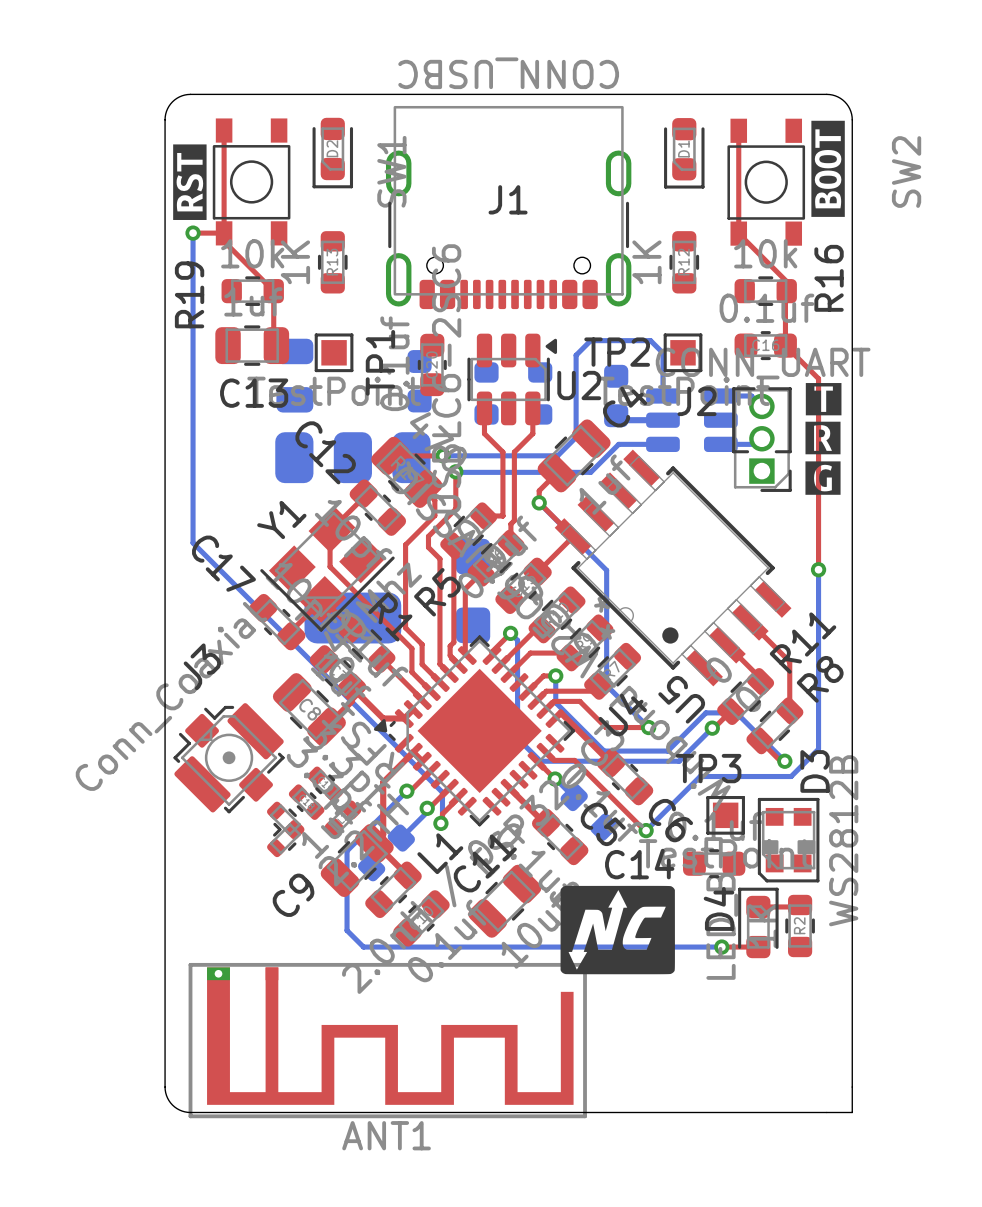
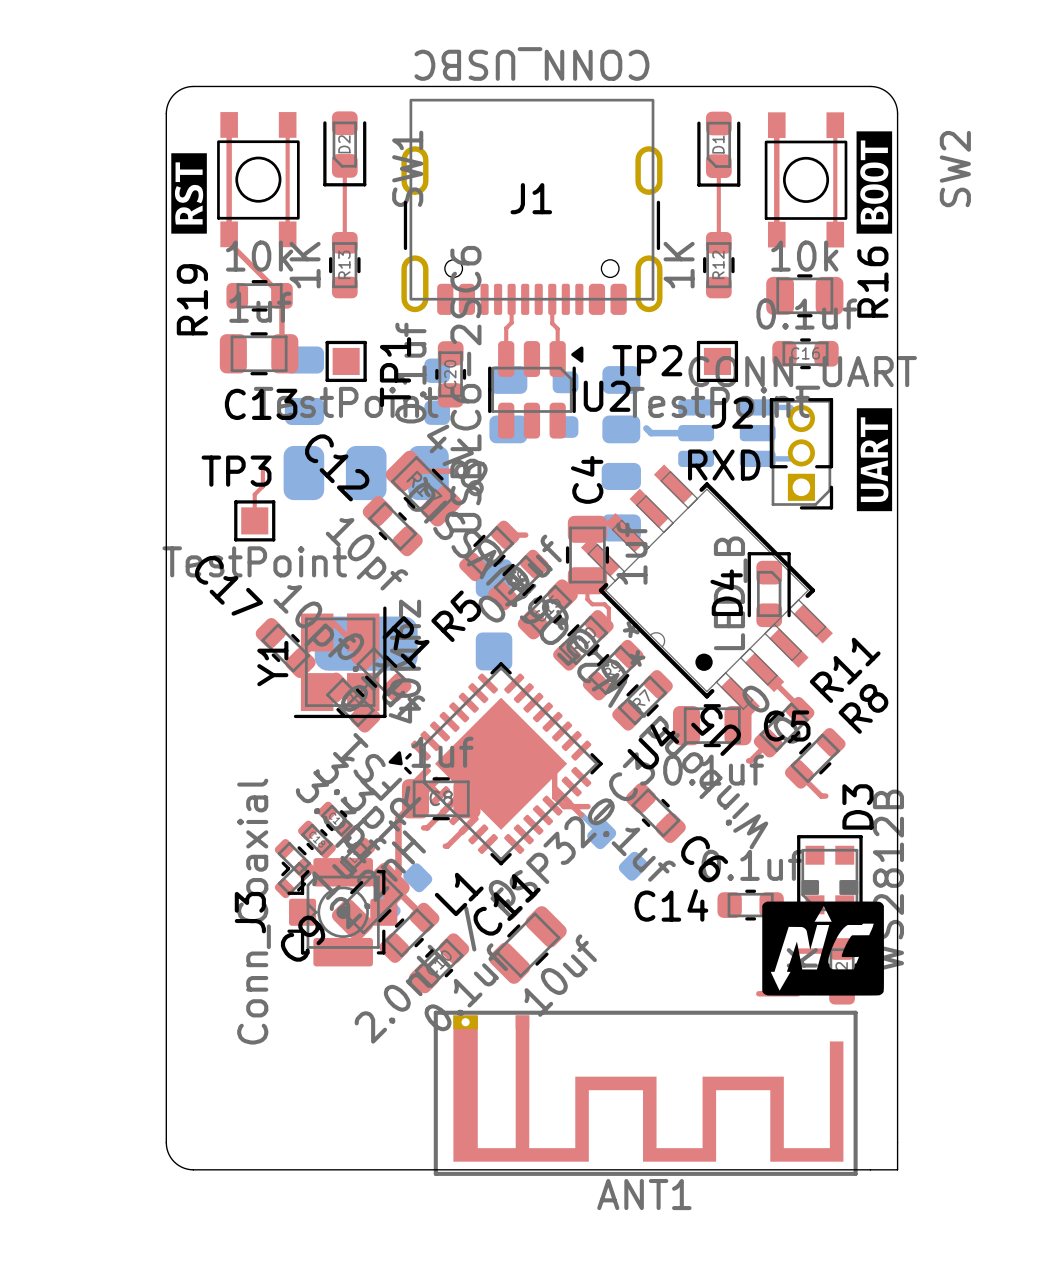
top track: none -> (287, 124) (287, 234)
top track: none -> (835, 125) (835, 234)
drawing position: (828, 168) -> (874, 182)
top track: none -> (344, 165) (344, 240)
top track: none -> (718, 166) (718, 240)
drawing position: (189, 182) -> (189, 193)
top track: (193, 233) (223, 233) -> none
bottom track: (193, 233) (193, 542) (442, 792) (440, 823) -> none
via: (193, 233) -> none
top track: (738, 233) (786, 281) (785, 345) (818, 378) (818, 569) -> none
R16 footprint: [734, 276, 797, 306] -> [766, 274, 844, 318]
top track: none -> (511, 299) (511, 322) (506, 328) (506, 359)
top track: none -> (552, 299) (552, 323) (557, 328) (557, 359)
part footprint: [474, 362, 499, 425] -> [489, 366, 528, 444]
part footprint: [604, 364, 629, 428] -> [602, 366, 641, 444]
drawing: [805, 383, 842, 416] -> none
bottom track: (662, 396) (662, 353) (650, 340) (590, 340) (576, 355) (576, 437) (557, 455) (443, 455) -> none
top track: (484, 408) (484, 433) (502, 452) (502, 515) -> none
top track: (532, 408) (532, 433) (514, 452) (514, 520) (510, 524) (510, 543) -> none
drawing shape: [805, 421, 841, 455] -> [856, 408, 893, 512]
bottom track: (662, 444) (618, 444) (590, 472) (455, 471) -> none
text: none -> RXD (724, 465)
top track: none -> (262, 470) (262, 486) (254, 494) (254, 520)
C4 rotation: 0° (574, 455) -> 45° counterclockwise (587, 555)
C4 position: (574, 455) -> (587, 555)
drawing: [805, 461, 841, 495] -> none
top track: (455, 471) (455, 509) (428, 536) (428, 547) (439, 558) (439, 664) (449, 673) -> none
top track: (557, 473) (539, 490) (539, 502) -> none
part: none -> (621, 502)
top track: (423, 488) (434, 500) (434, 515) (405, 544) (405, 627) (422, 644) (422, 664) (440, 682) -> none
top track: (363, 493) (363, 497) (330, 531) (330, 566) (411, 648) (411, 672) (431, 691) -> none
top track: (539, 502) (573, 536) (537, 571) -> none
bottom track: (539, 502) (606, 570) (606, 685) (648, 727) -> none
via: (539, 502) -> none
top track: (453, 545) (453, 642) (450, 646) (450, 655) (458, 664) -> none
top track: none -> (587, 580) (587, 599) (592, 604) (604, 604) (608, 608) (608, 626)
Y1 rotation: 0° (327, 568) -> 45° counterclockwise (340, 662)
bottom track: (818, 569) (818, 749) (791, 776) (700, 776) (646, 830) -> none
via: (818, 569) -> none
top track: (481, 573) (465, 588) (465, 654) (467, 655) -> none
top track: (750, 622) (789, 661) (789, 710) -> none
top track: (542, 629) (535, 629) (501, 664) -> none
top track: (510, 633) (492, 651) (492, 655) -> none
bottom track: (510, 633) (517, 640) (517, 738) (540, 761) (679, 761) (712, 728) -> none
via: (510, 633) -> none
top track: (570, 657) (565, 653) (530, 653) (510, 673) -> none
top track: (381, 659) (422, 700) -> none
top track: (555, 675) (543, 675) (528, 691) -> none
bottom track: (555, 675) (555, 702) (604, 751) (667, 751) (705, 712) (736, 712) (784, 761) -> none
via: (555, 675) -> none
top track: (597, 686) (592, 691) (546, 691) (537, 700) -> none
C8 rotation: 0° (309, 709) -> 45° counterclockwise (441, 798)
C8 position: (309, 709) -> (441, 798)
top track: (413, 709) (404, 718) (383, 718) (352, 687) (352, 701) (326, 726) -> none
top track: (546, 709) (554, 701) (579, 701) (606, 727) (648, 727) -> none
top track: (555, 718) (560, 712) (611, 763) -> none
top track: none -> (541, 758) (554, 758) (554, 797) (564, 806) (588, 806)
via: (648, 727) -> none
via: (712, 728) -> none
top track: (546, 752) (554, 760) (574, 760) (646, 830) -> none
J3 rotation: 0° (229, 758) -> 45° counterclockwise (342, 912)
J3 position: (229, 758) -> (342, 912)
via: (784, 761) -> none
via: (555, 779) -> none
top track: (510, 788) (546, 823) -> none
bottom track: (406, 791) (347, 850) (347, 930) (363, 947) (721, 947) -> none
via: (406, 791) -> none
top track: (458, 797) (442, 814) (440, 823) -> none
bottom track: (427, 808) (427, 812) (401, 838) -> none
via: (427, 808) -> none
C5 footprint: [531, 808, 589, 866] -> [672, 704, 752, 748]
TP3 position: (725, 815) -> (254, 520)
via: (440, 823) -> none
via: (646, 830) -> none
D4 name position: D4 (719, 908) -> D4 (726, 592)
D4 position: (758, 922) -> (769, 589)
drawing position: (617, 930) -> (823, 948)
via: (721, 947) -> none
ANT1 position: (387, 1040) -> (645, 1093)

